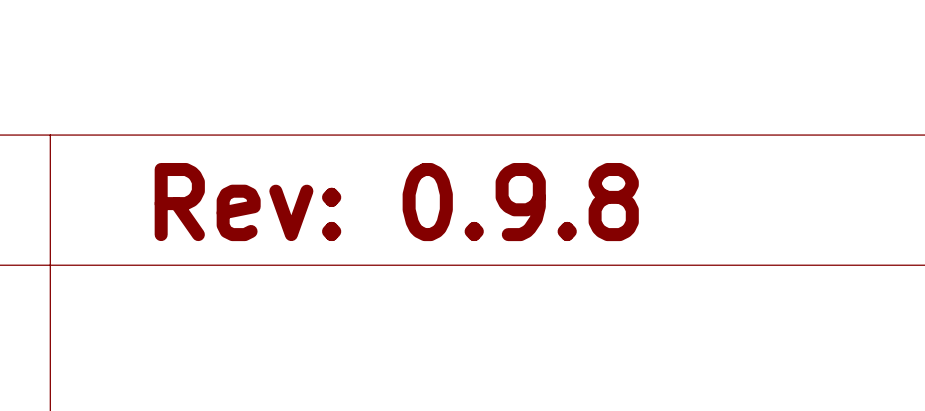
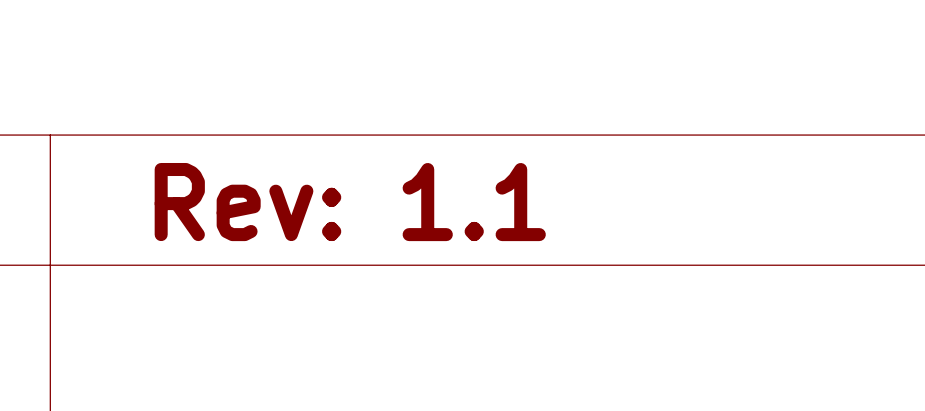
title block: Rev: 0.9.8 (396, 202) -> Rev: 1.1 (350, 202)

